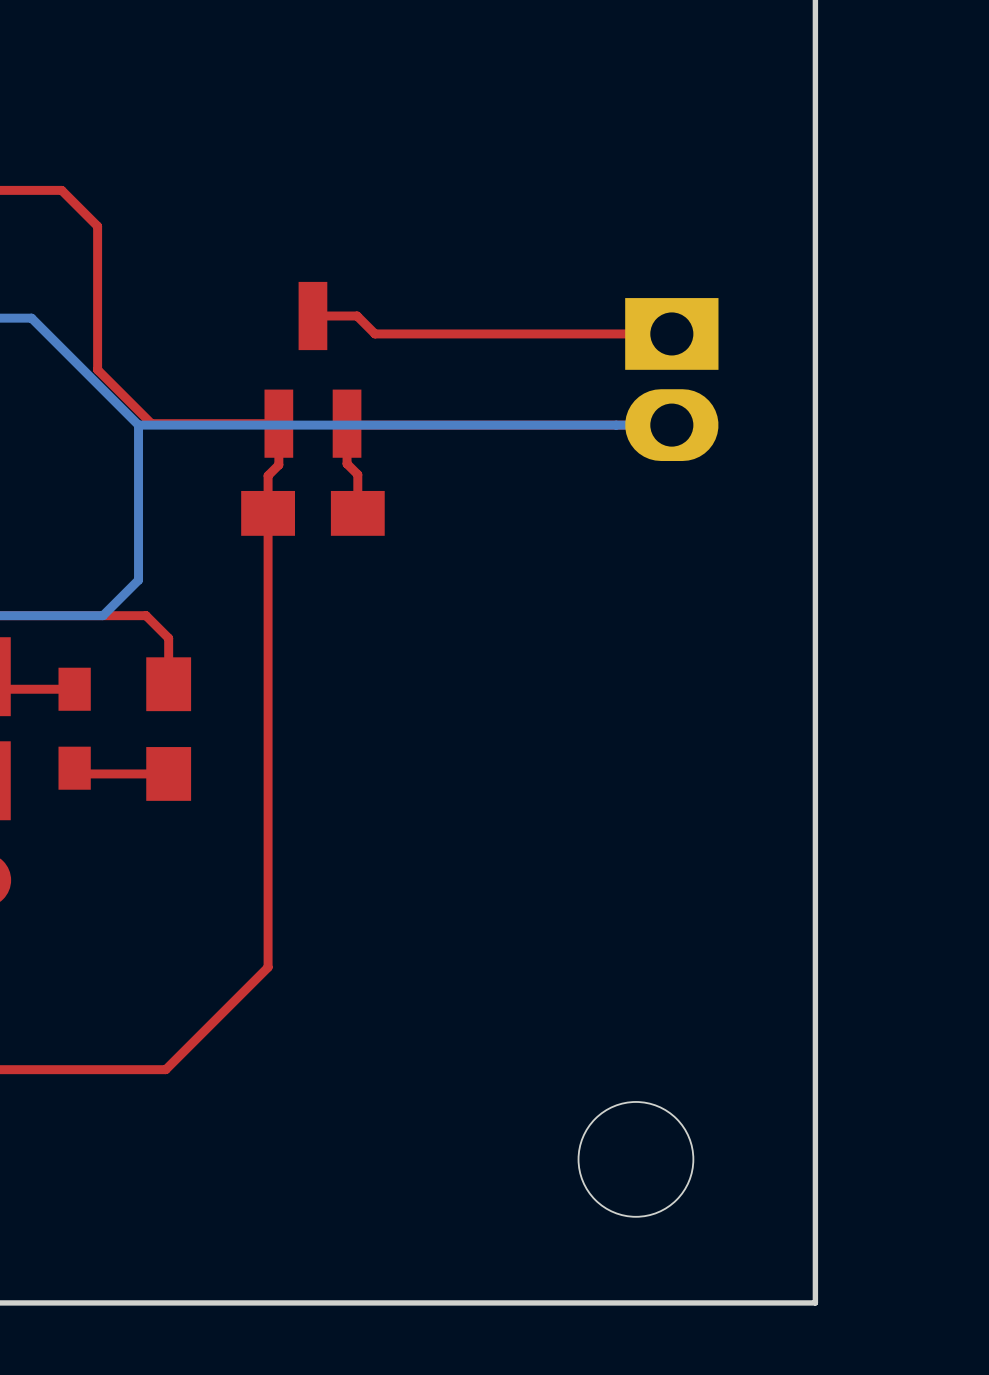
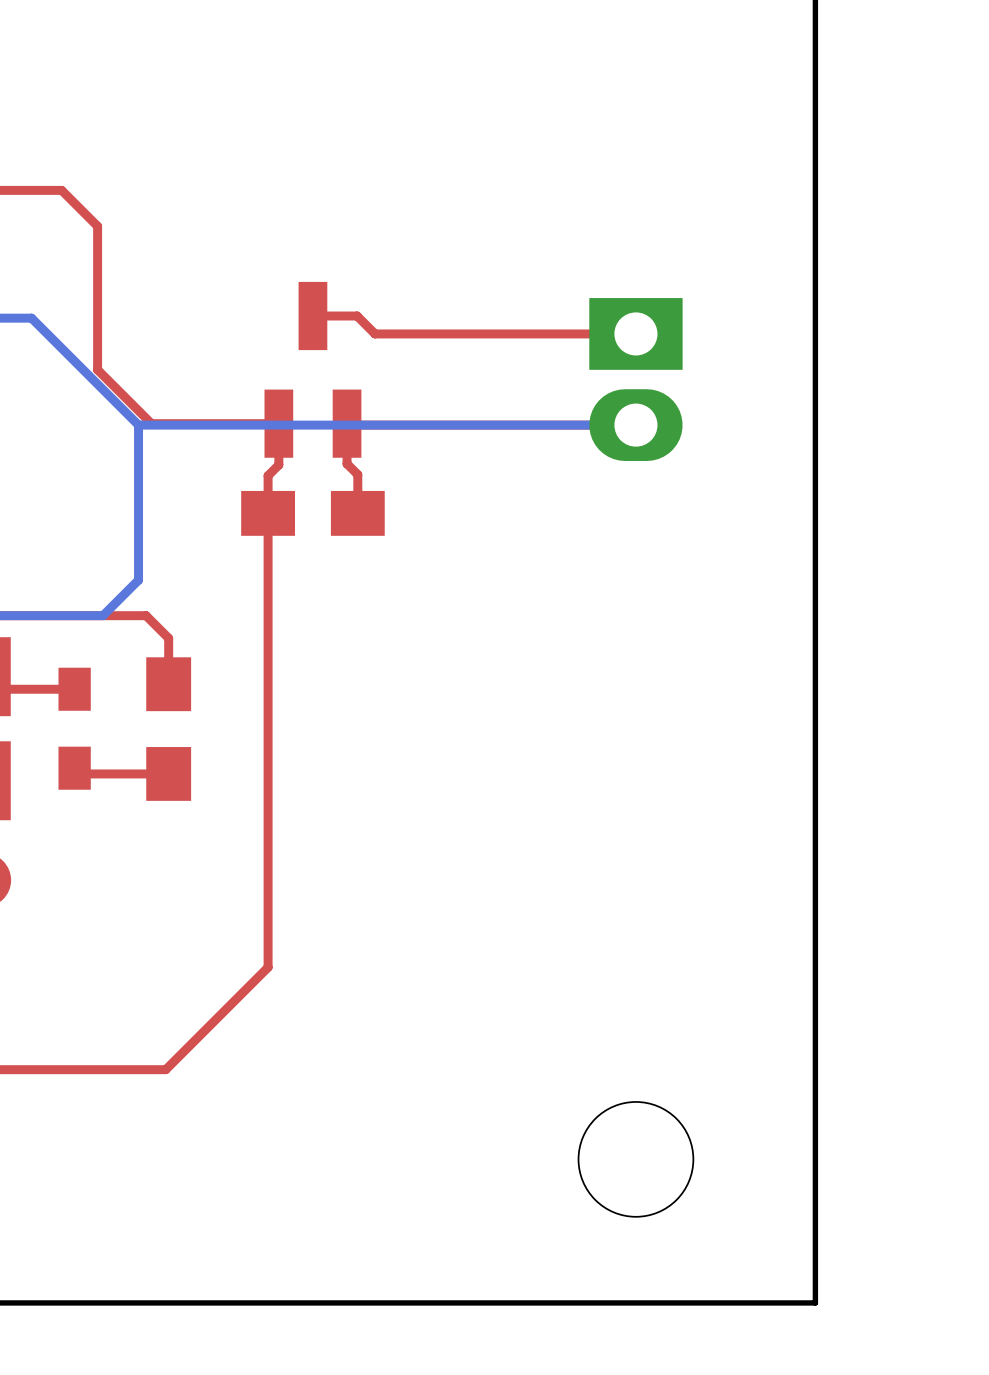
part position: (671, 379) -> (635, 379)

